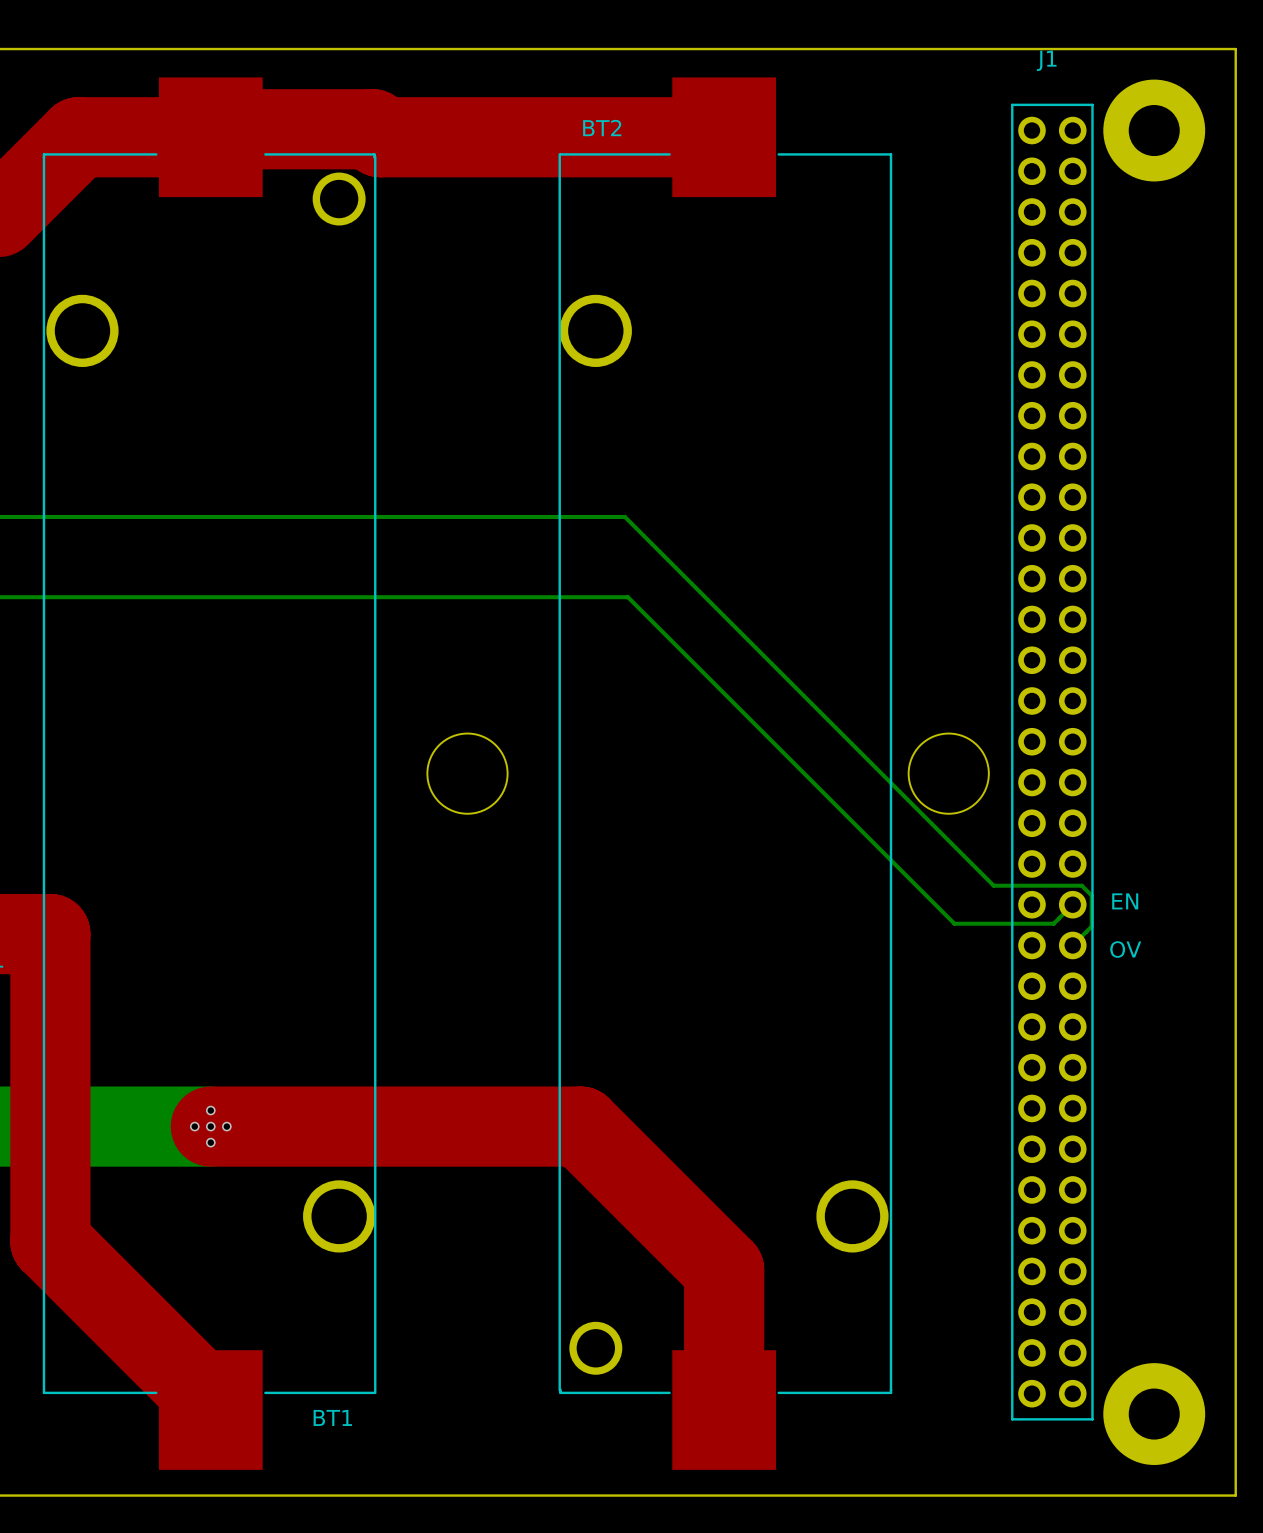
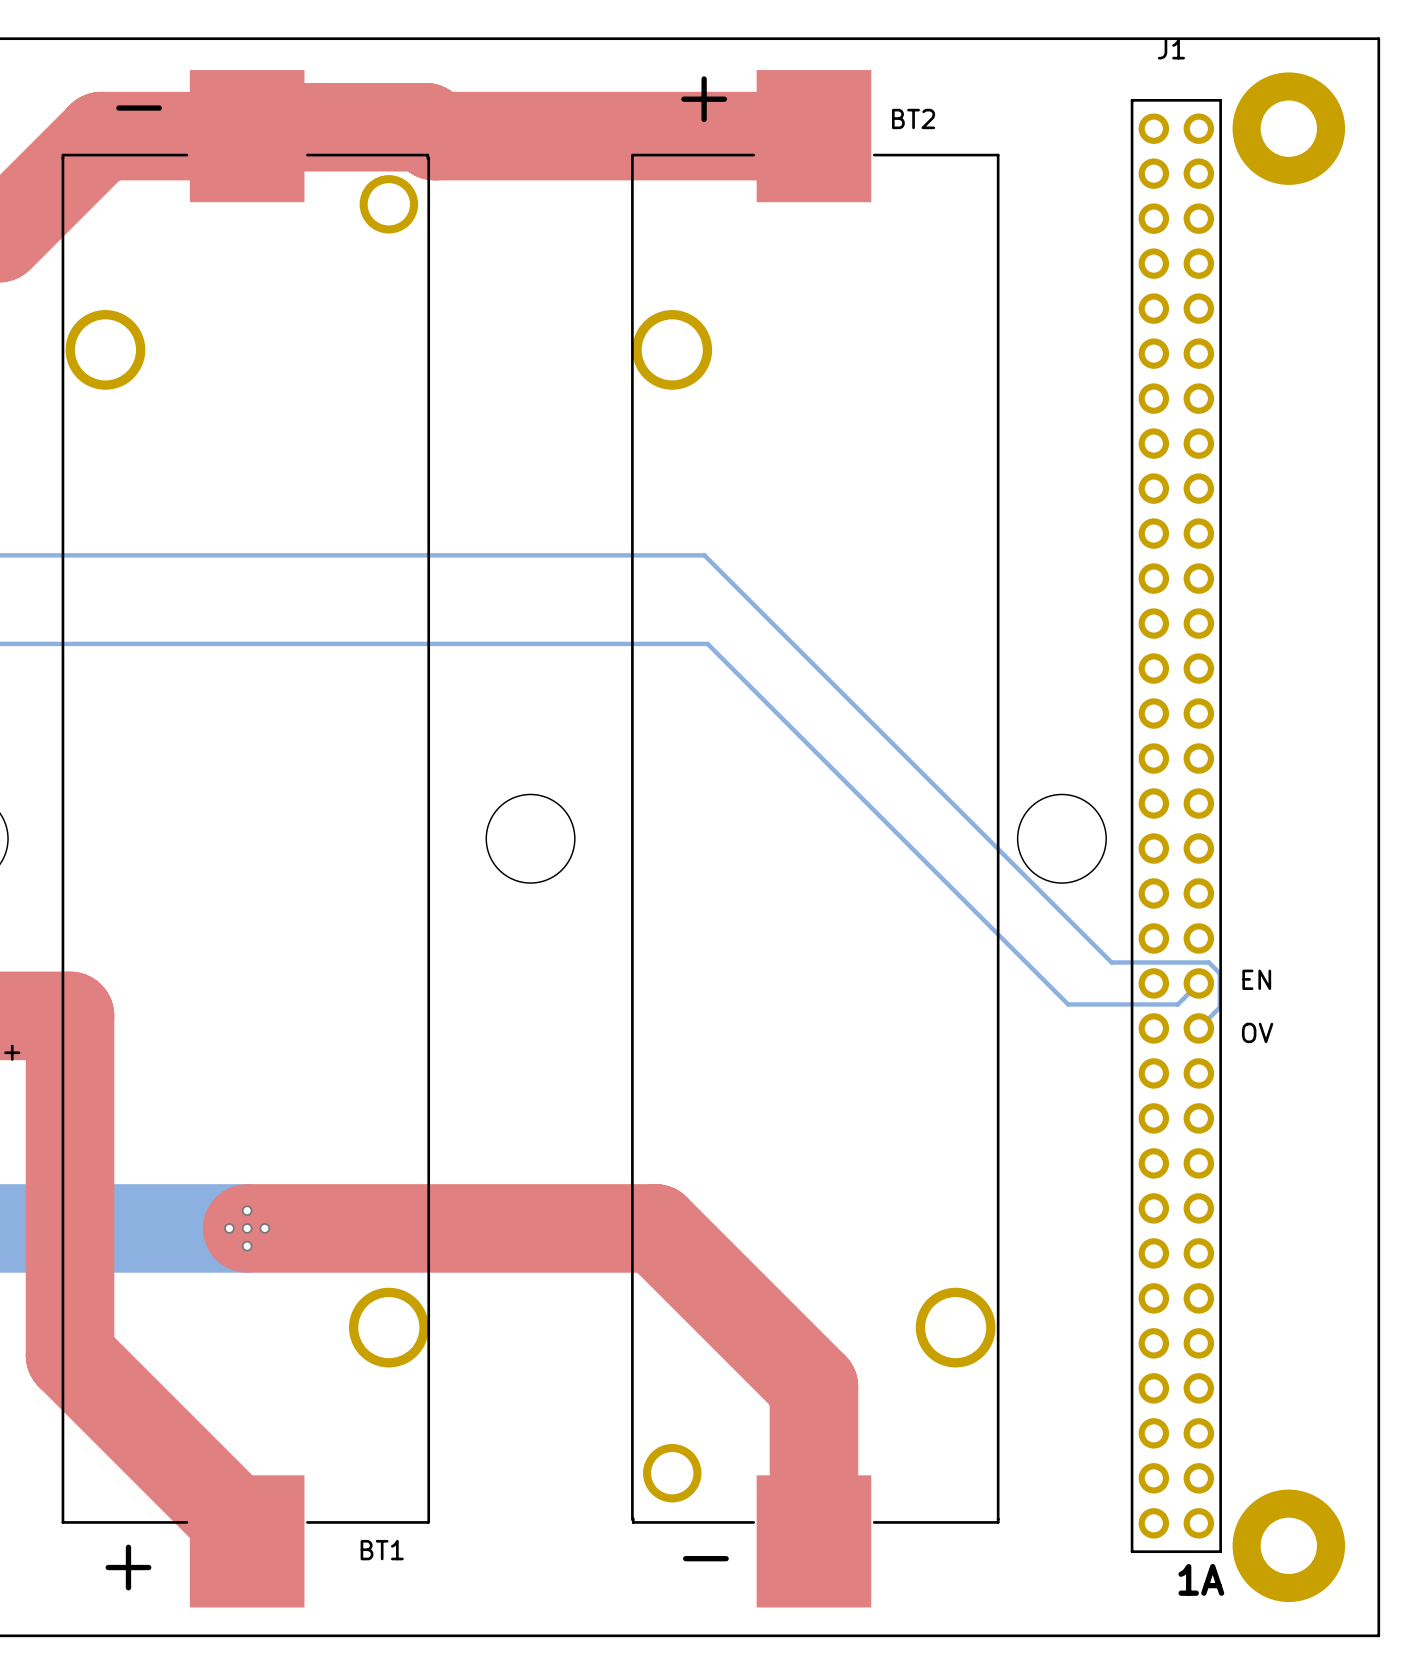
text: none -> + (704, 99)
text: none -> - (139, 108)
BT2 name position: BT2 (602, 128) -> BT2 (913, 118)
text: none -> - (705, 1558)
text: none -> + (128, 1567)
text: none -> 1A (1201, 1579)

